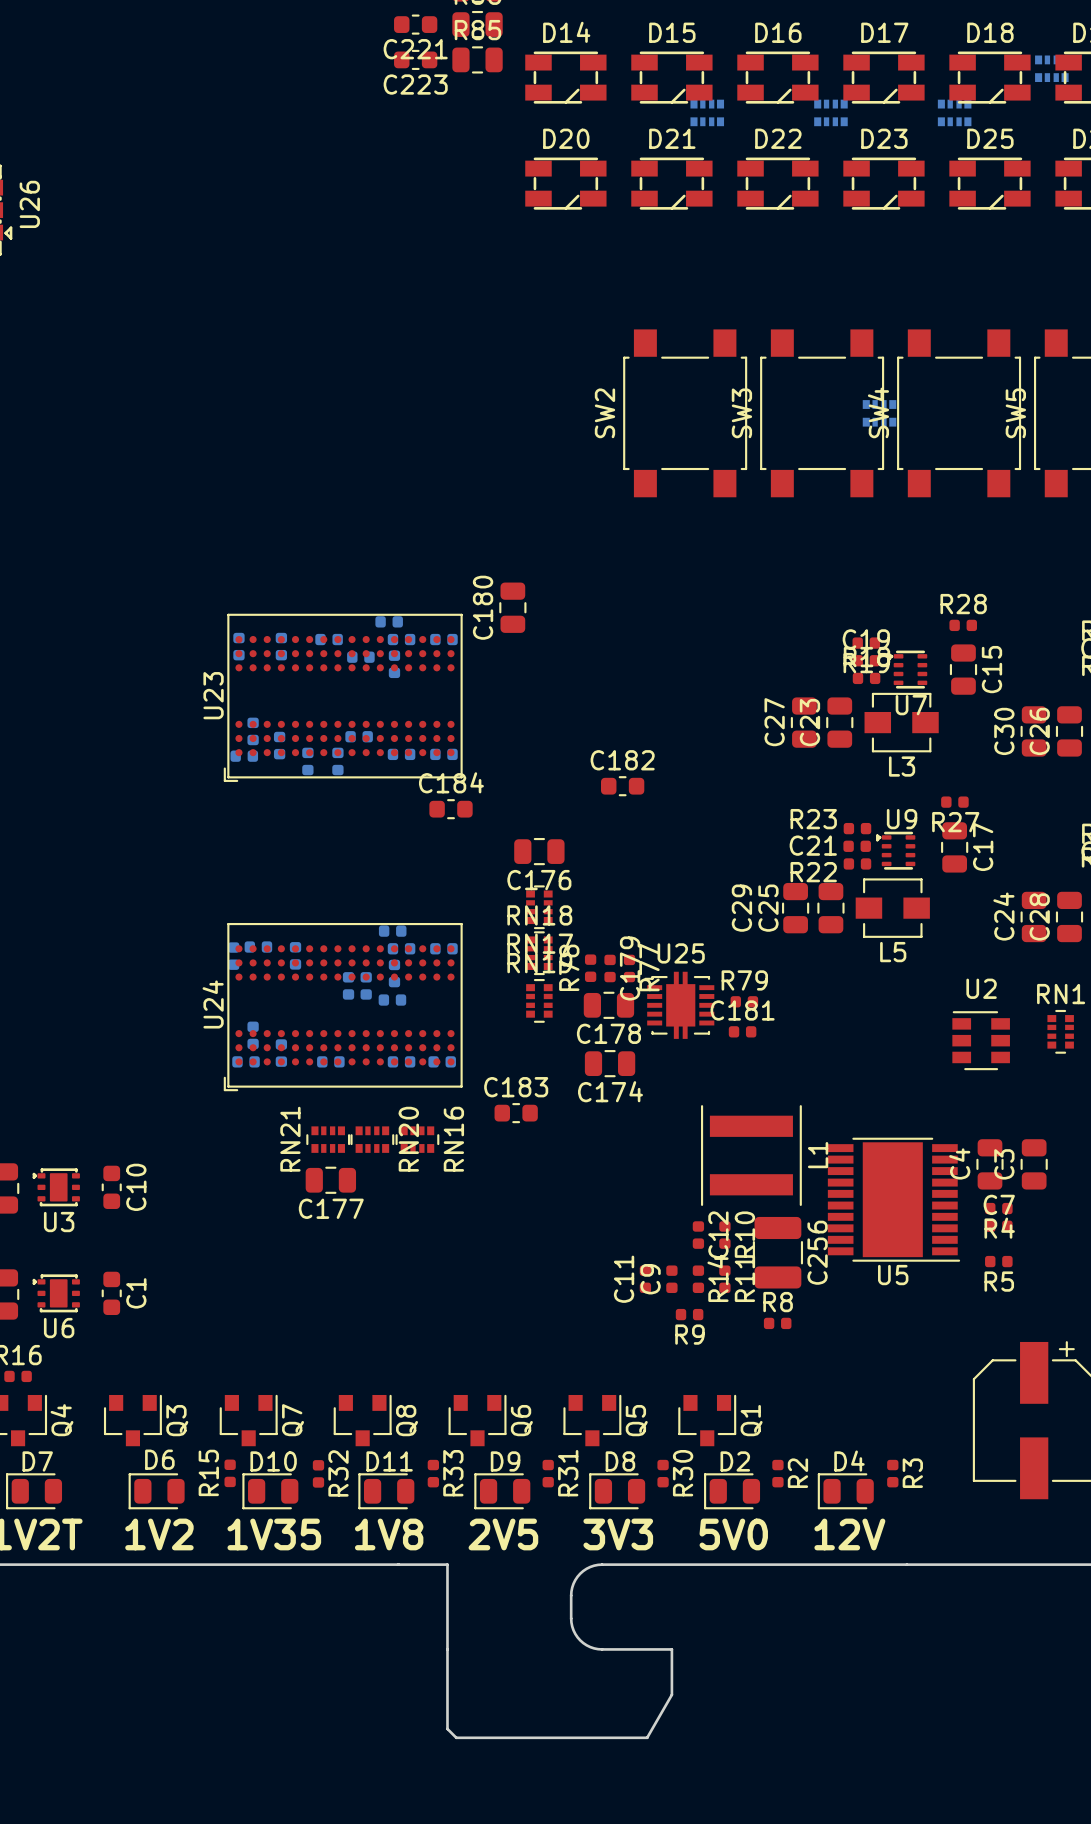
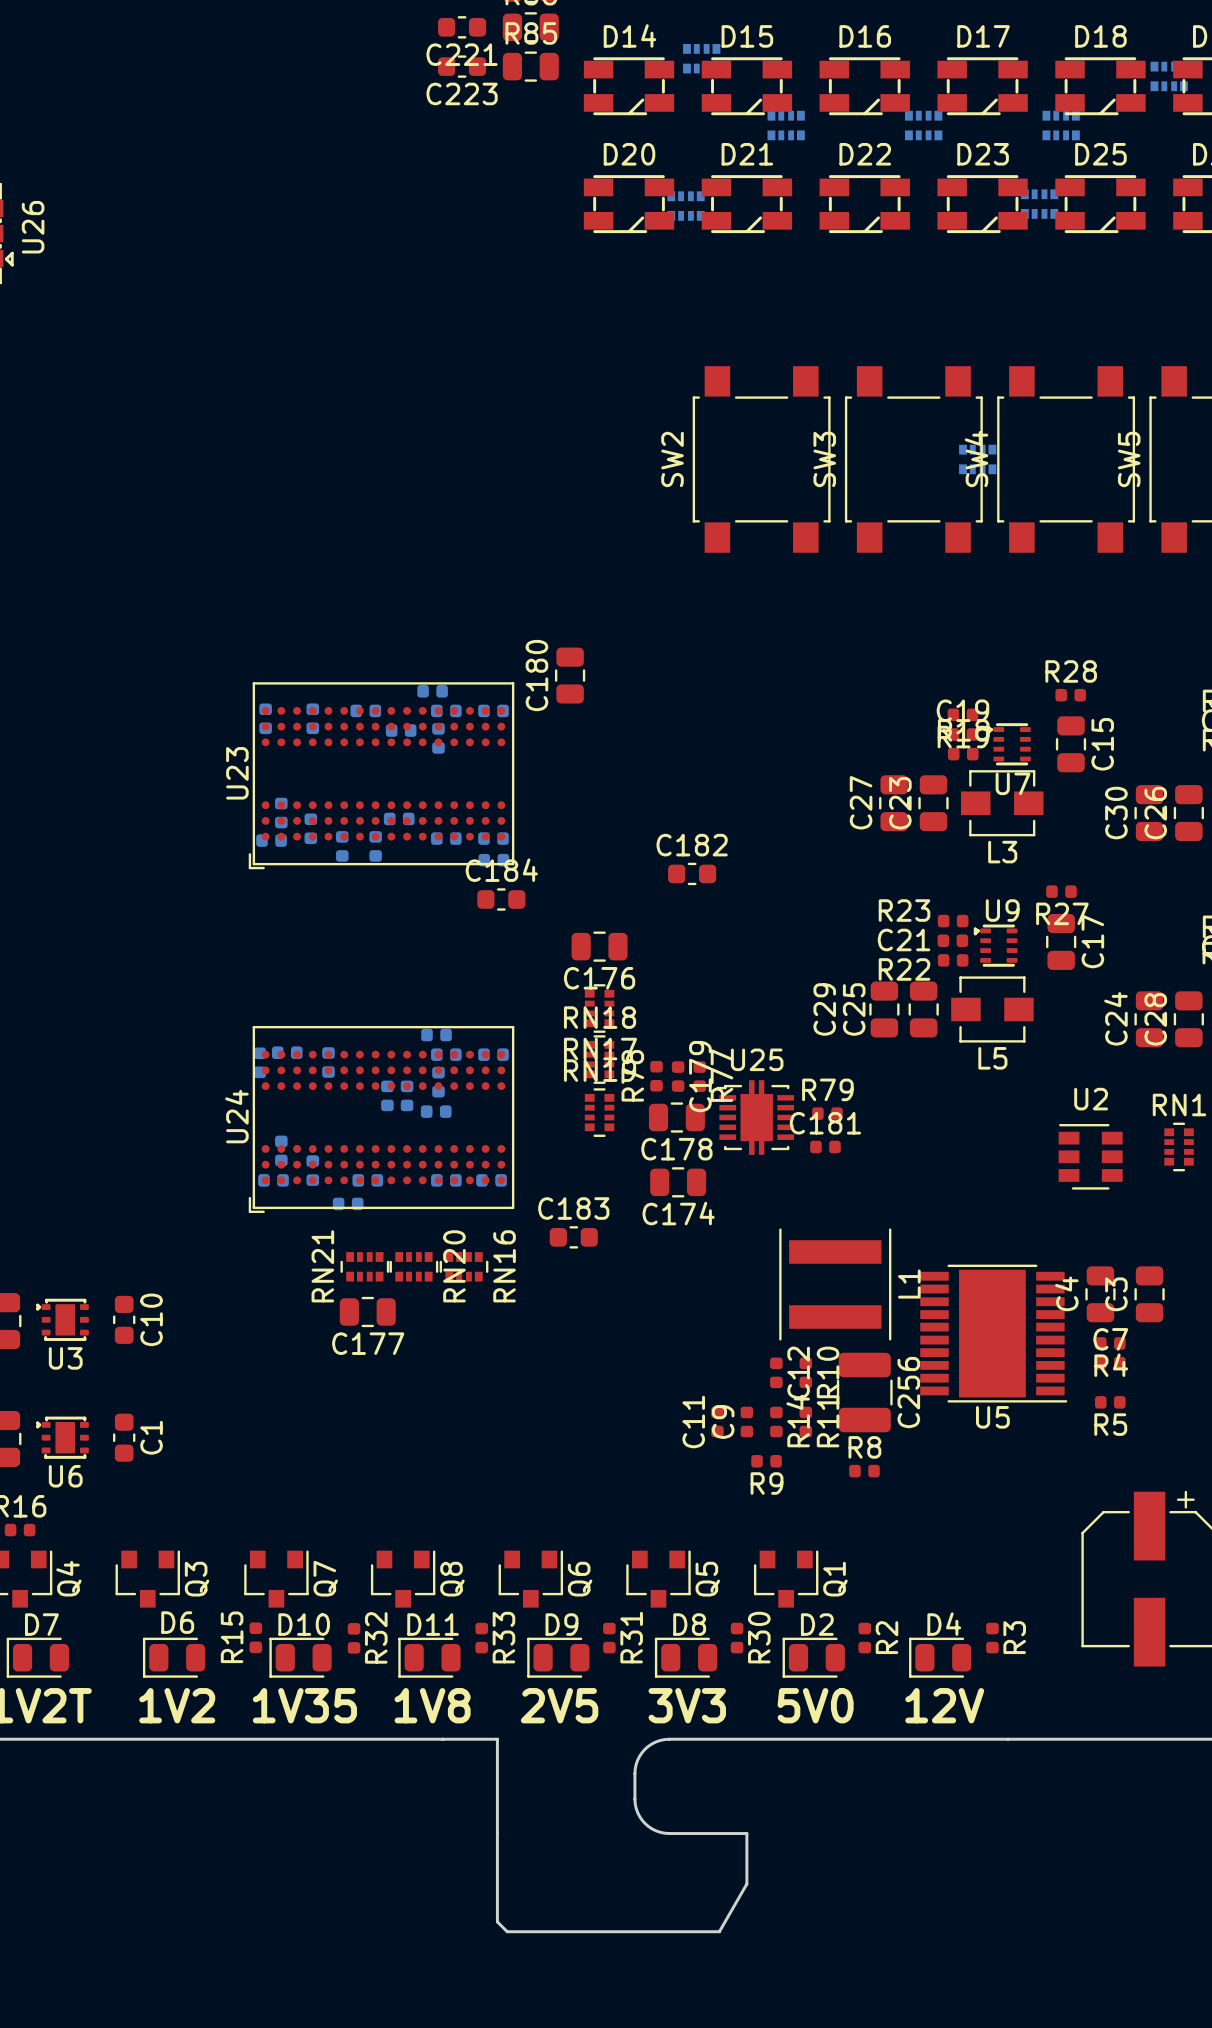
part: none -> (701, 58)
part: none -> (1039, 204)
part: none -> (685, 206)
part: none -> (493, 860)
part: none -> (348, 1203)

